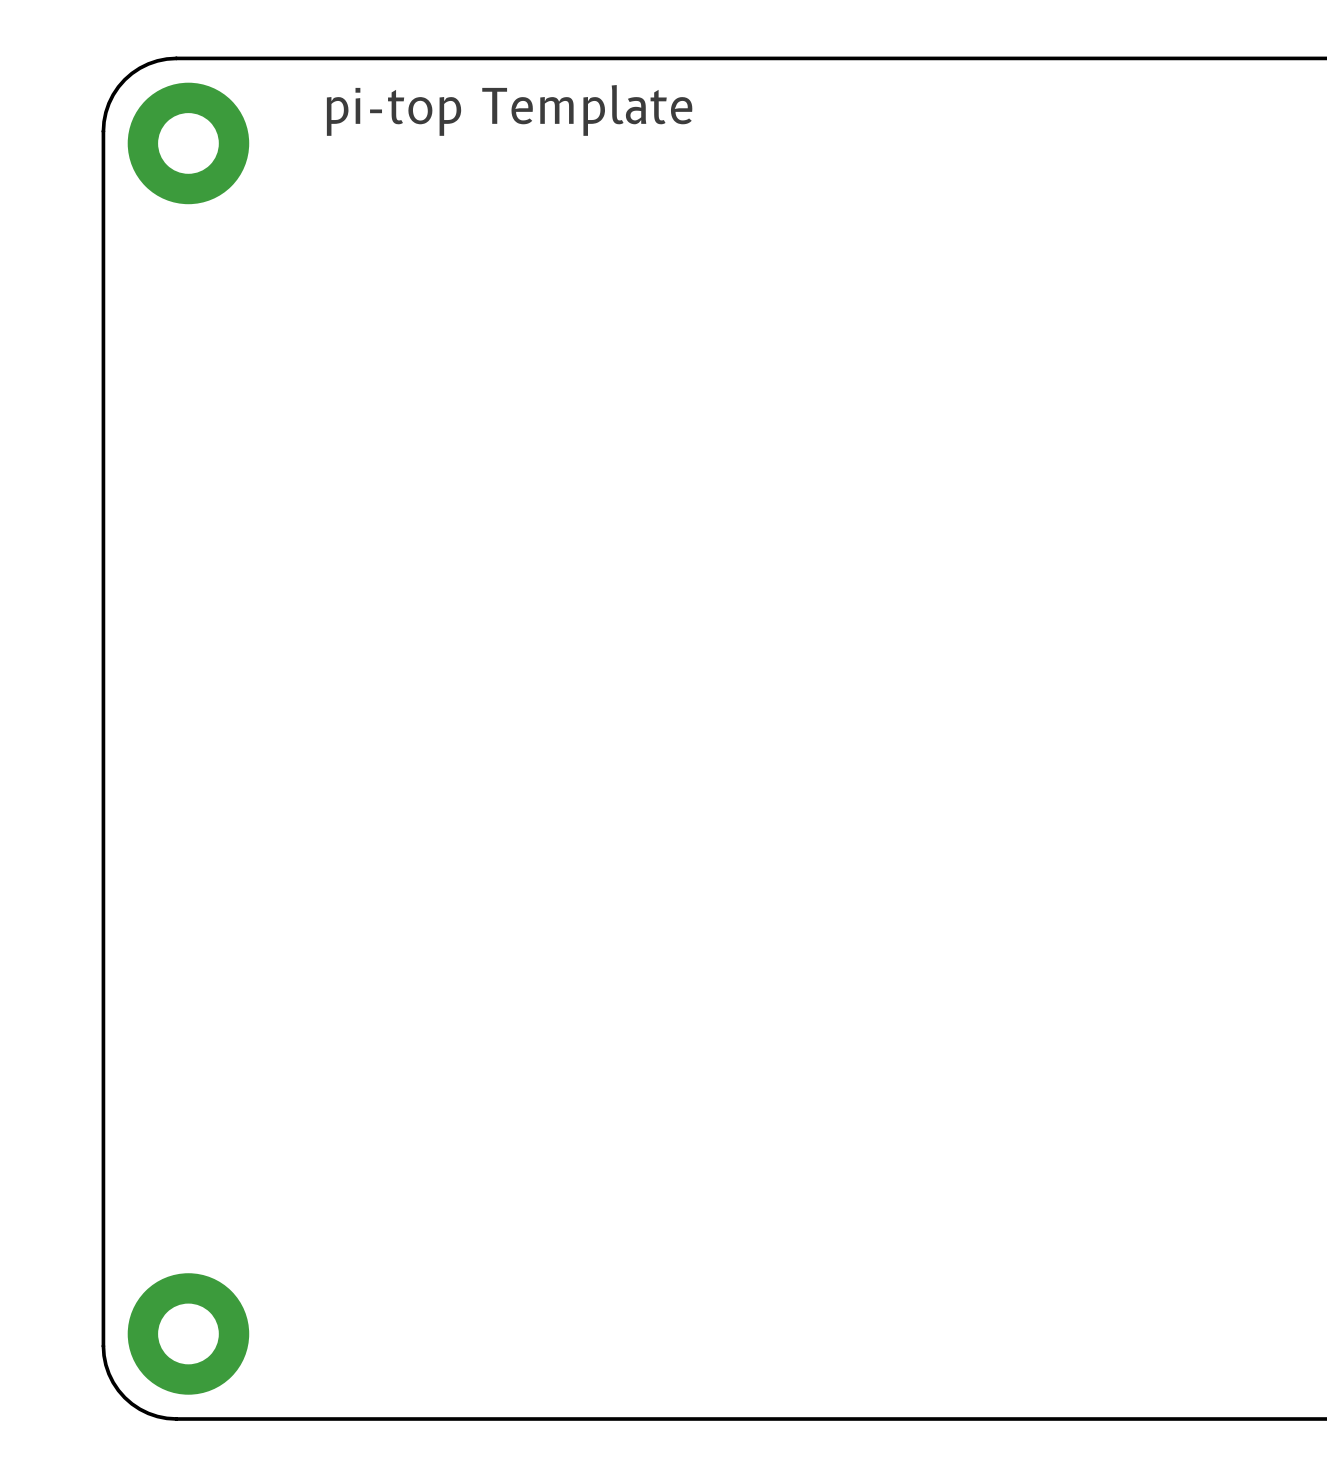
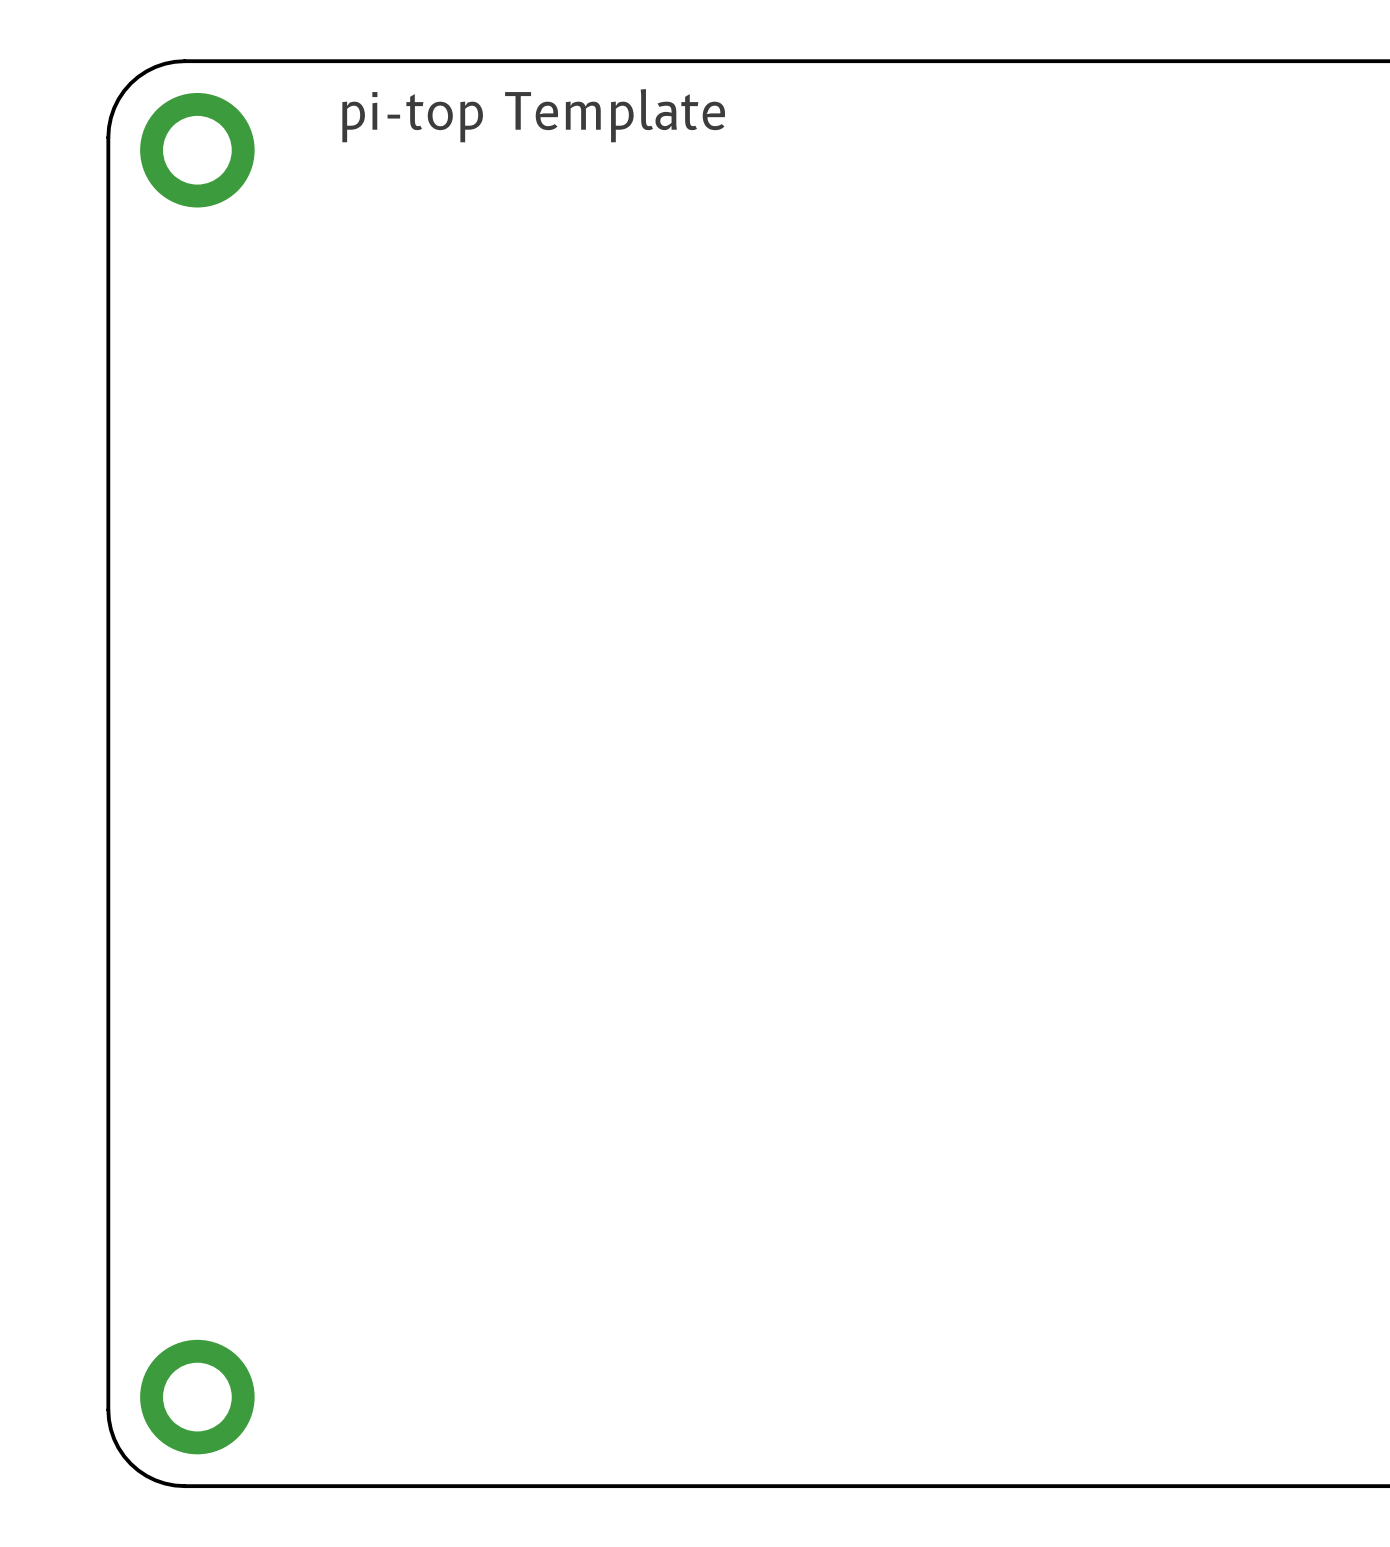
part footprint: [127, 82, 250, 205] -> [140, 92, 255, 208]
part footprint: [127, 1273, 250, 1395] -> [140, 1339, 255, 1455]

